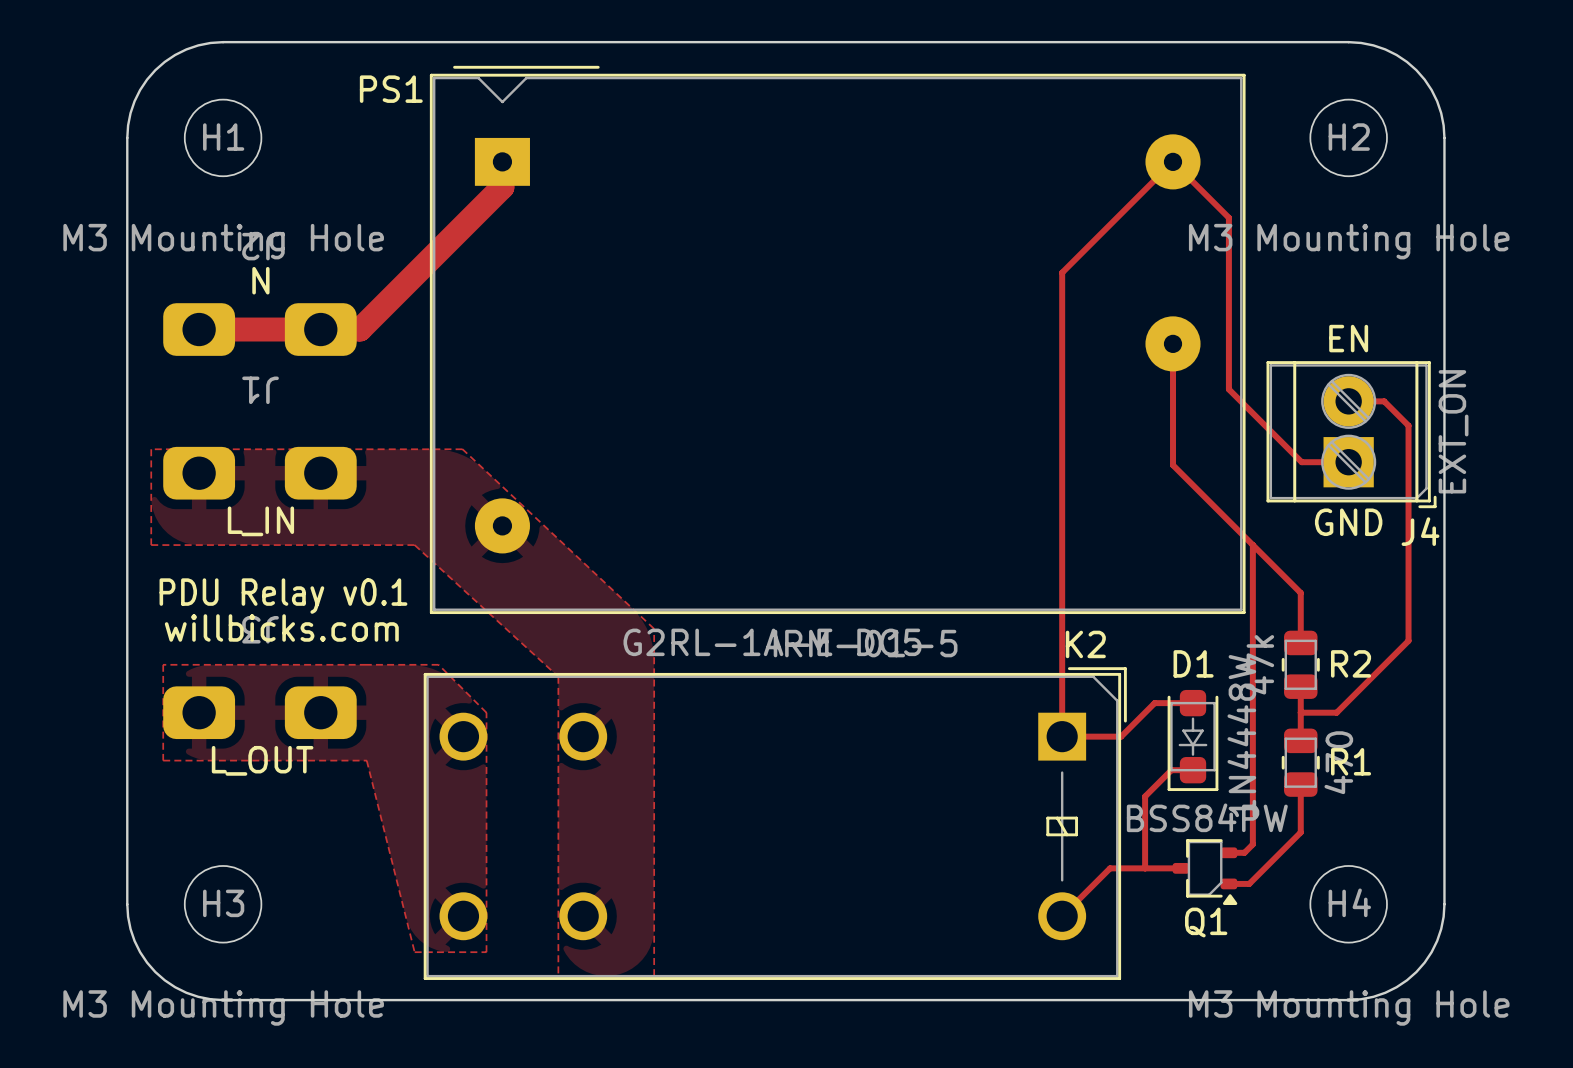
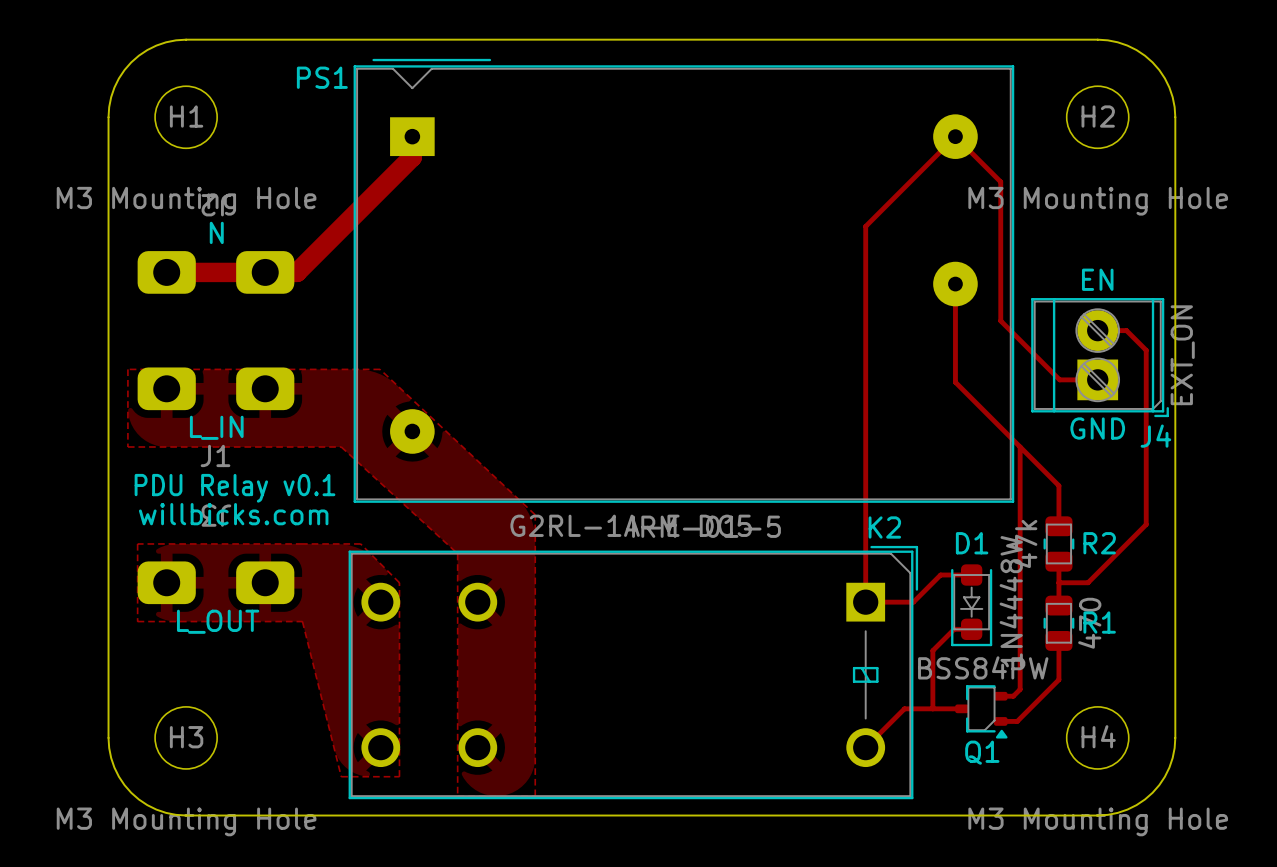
J1 name rotation: 0° (260, 390) -> 180° (215, 455)
J1 name position: J1 (260, 390) -> J1 (215, 455)

